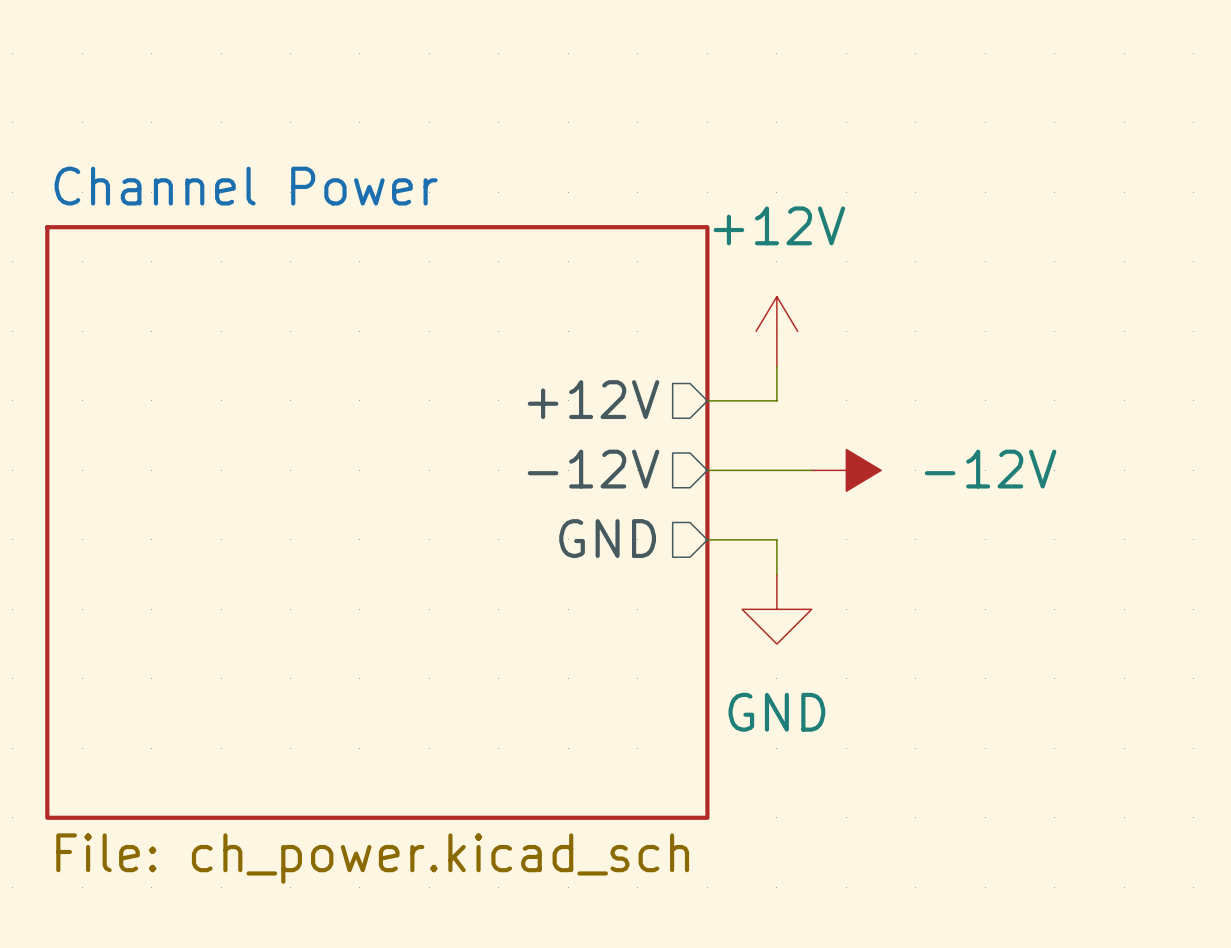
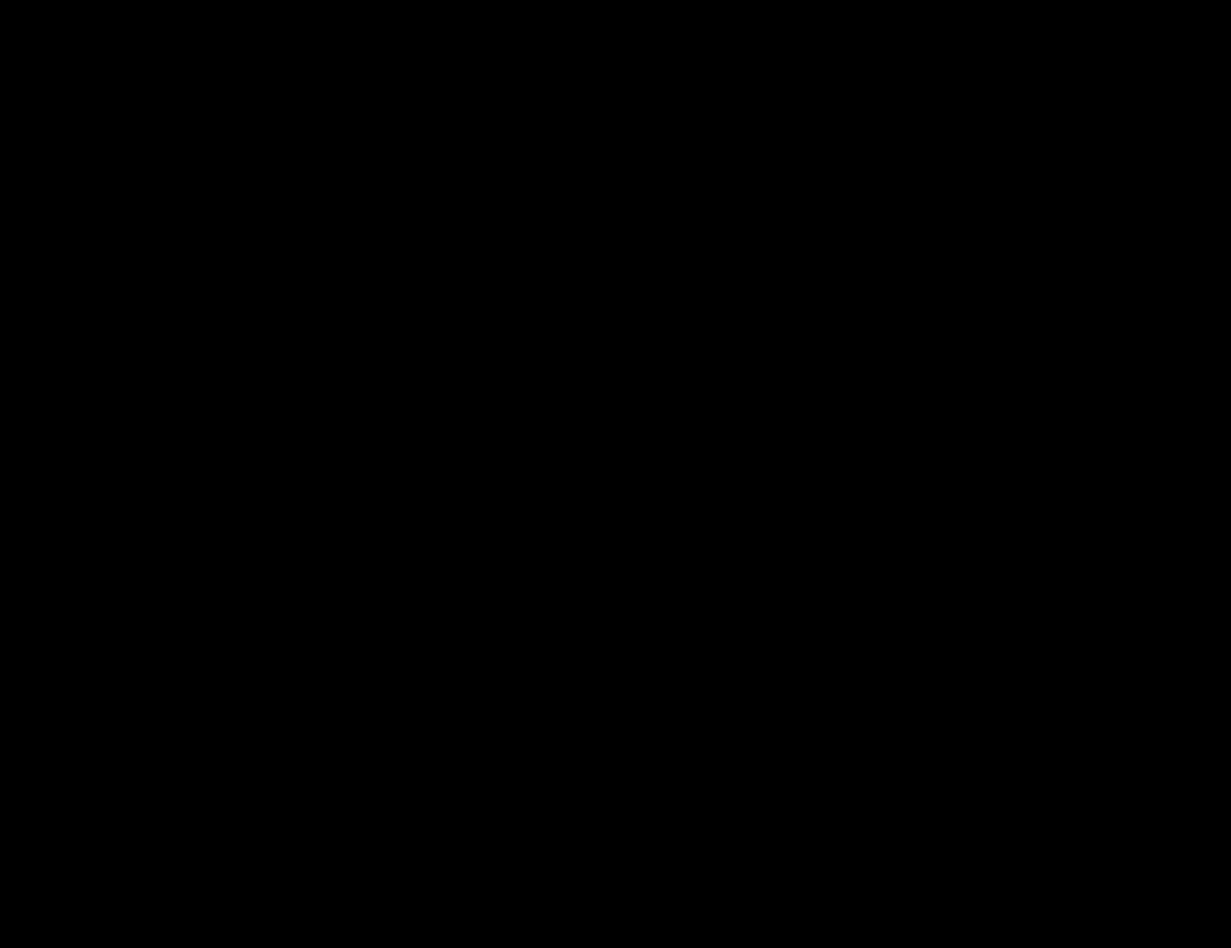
power symbol: +12V (776, 331) -> none
wire: (776, 366) (776, 400) (707, 400) -> none
sheet pin: +12V (593, 399) -> none
sheet pin: -12V (593, 469) -> none
wire: (707, 470) (811, 470) -> none
power symbol: -12V (846, 470) -> none
sheet Channel Power: File: ch_power.kicad_sch (377, 522) -> none
sheet pin: GND (607, 538) -> none
wire: (707, 539) (776, 539) (776, 574) -> none
power symbol: GND (776, 609) -> none

